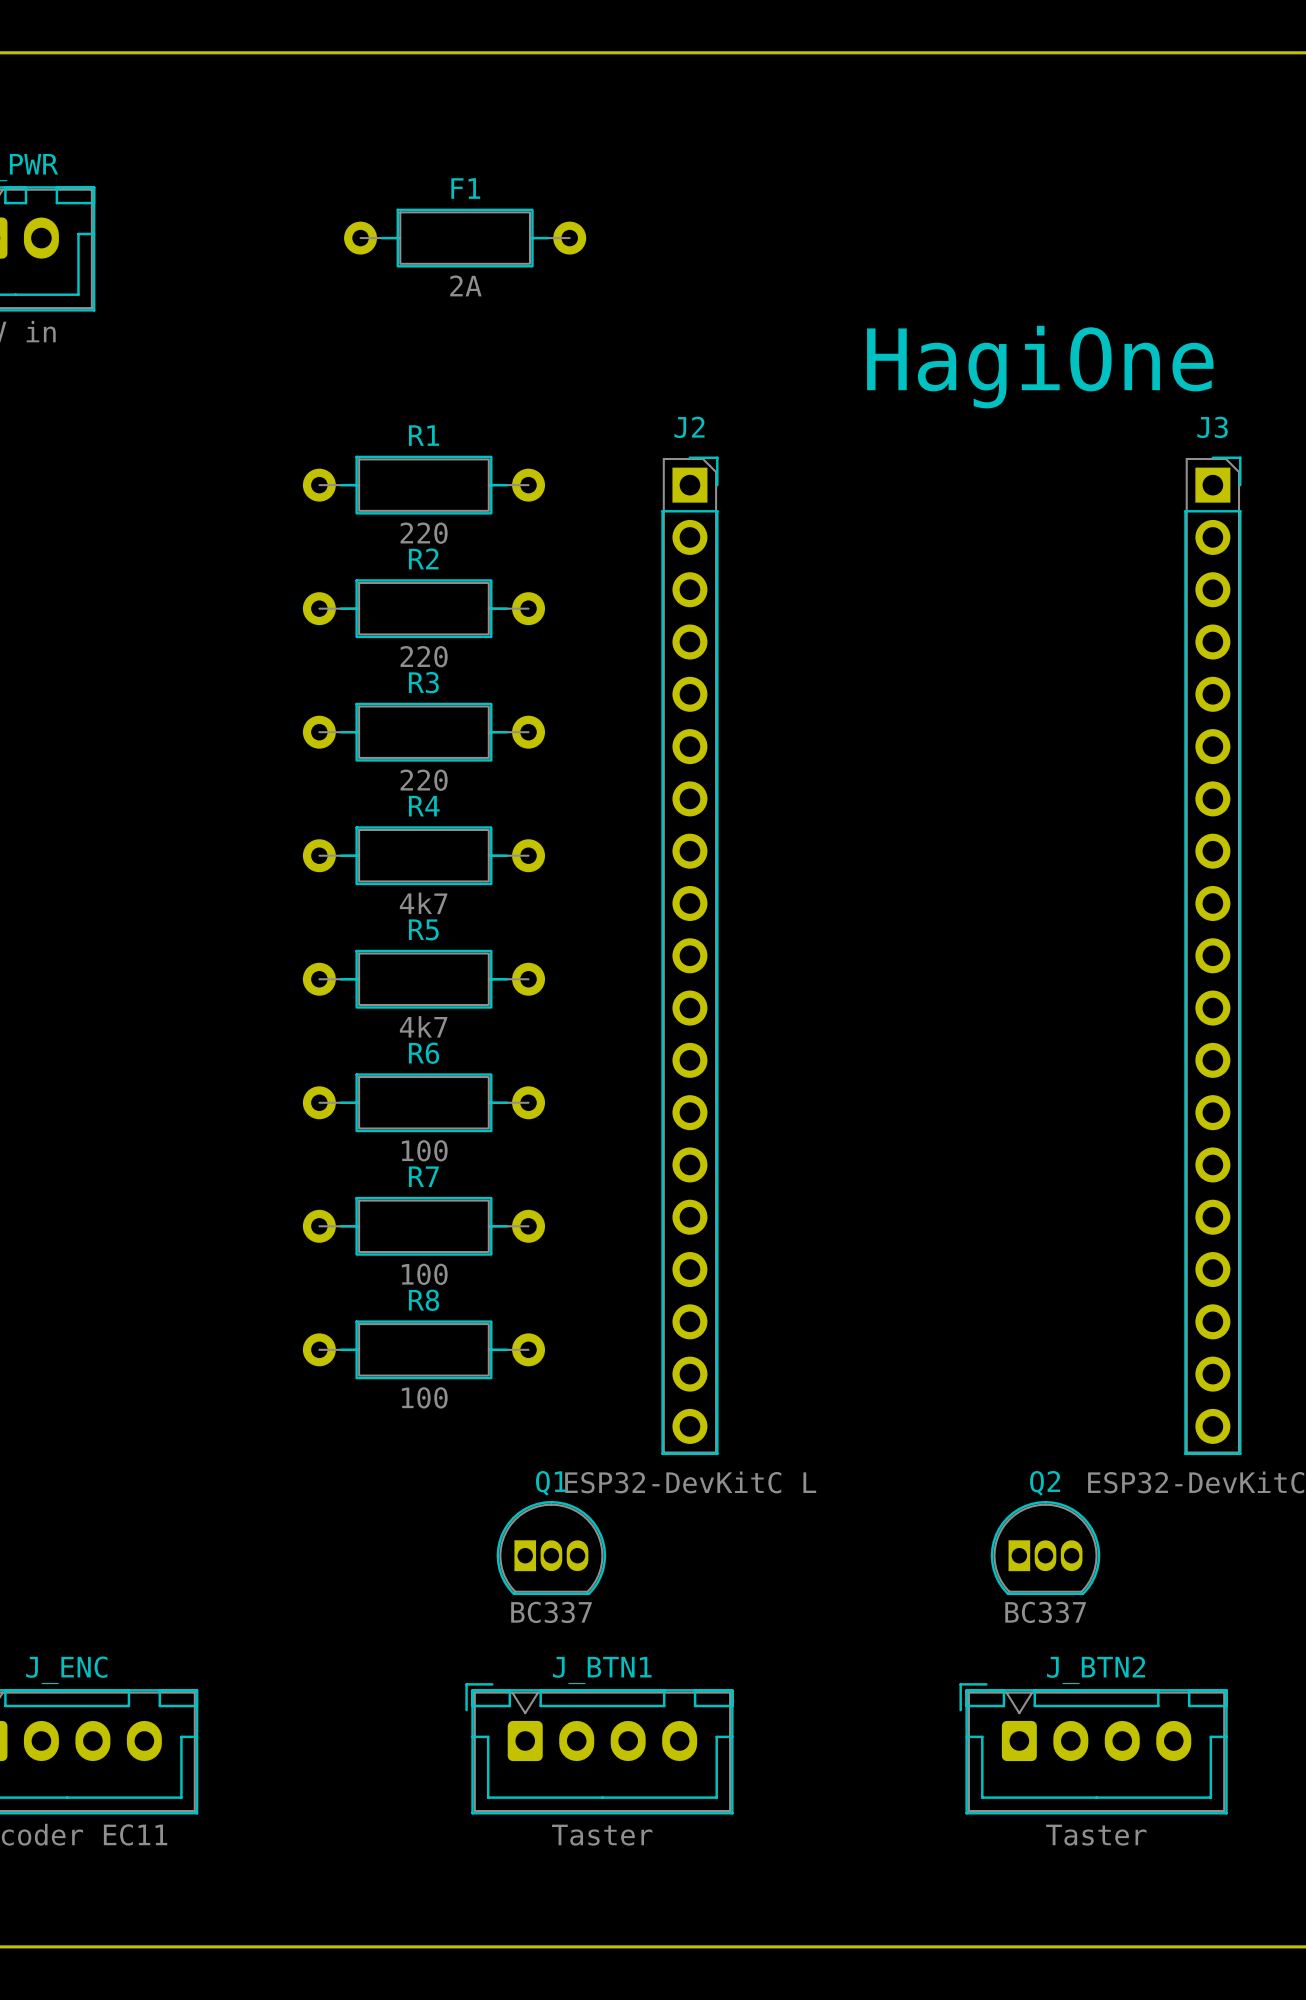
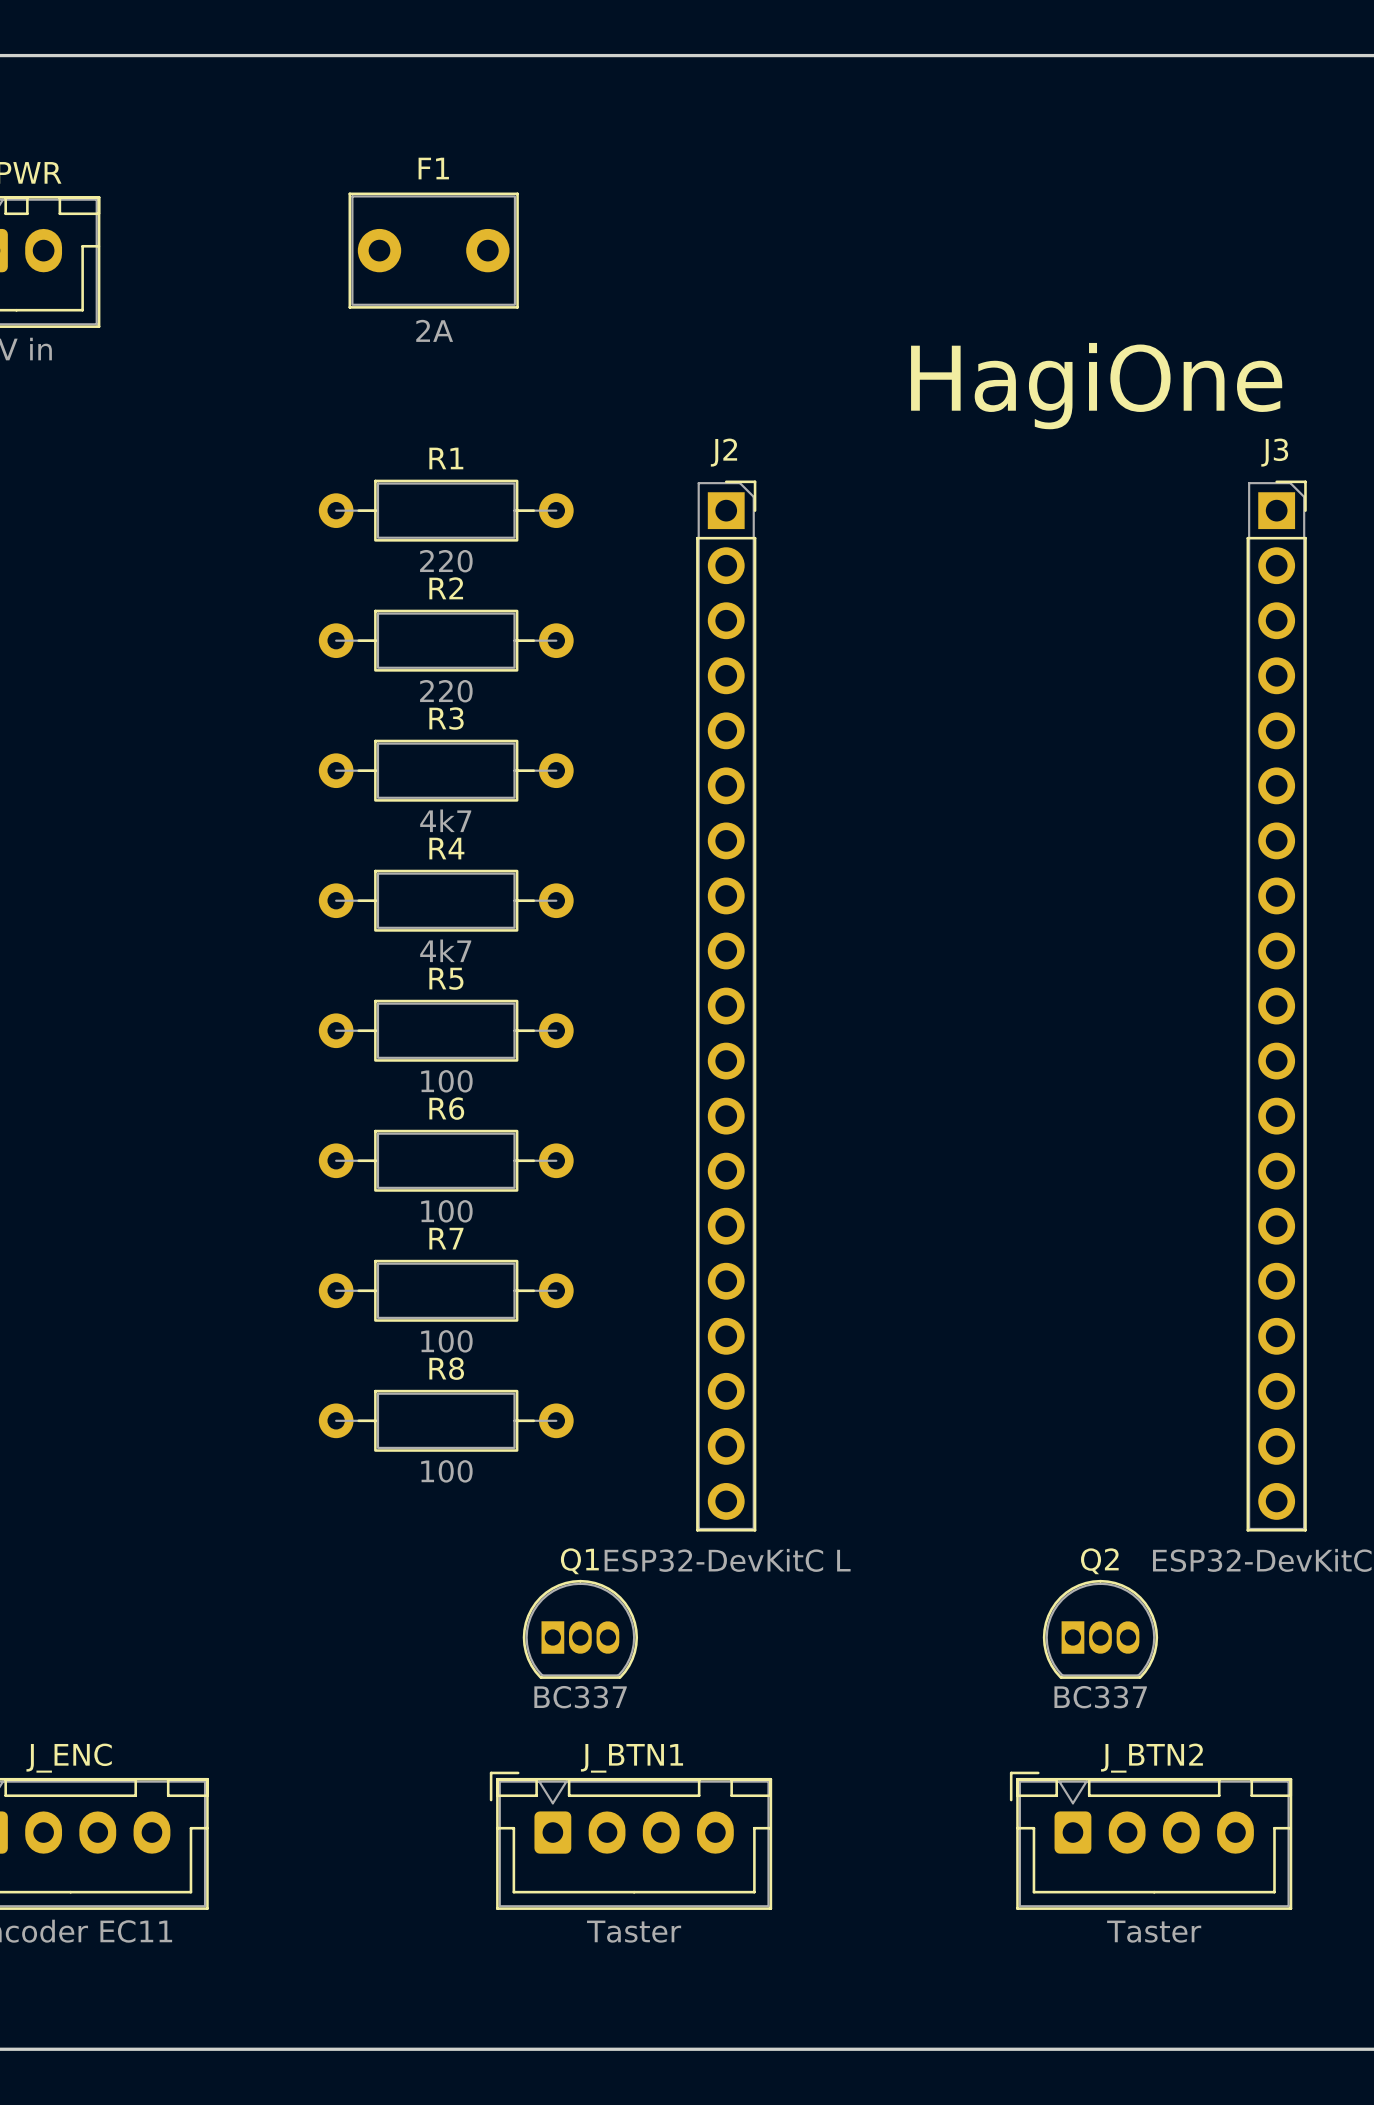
F1 footprint: [344, 208, 587, 268] -> [348, 192, 519, 309]
R3 value: 220 (424, 780) -> 4k7 (445, 820)
R5 value: 4k7 (423, 1026) -> 100 (446, 1081)

